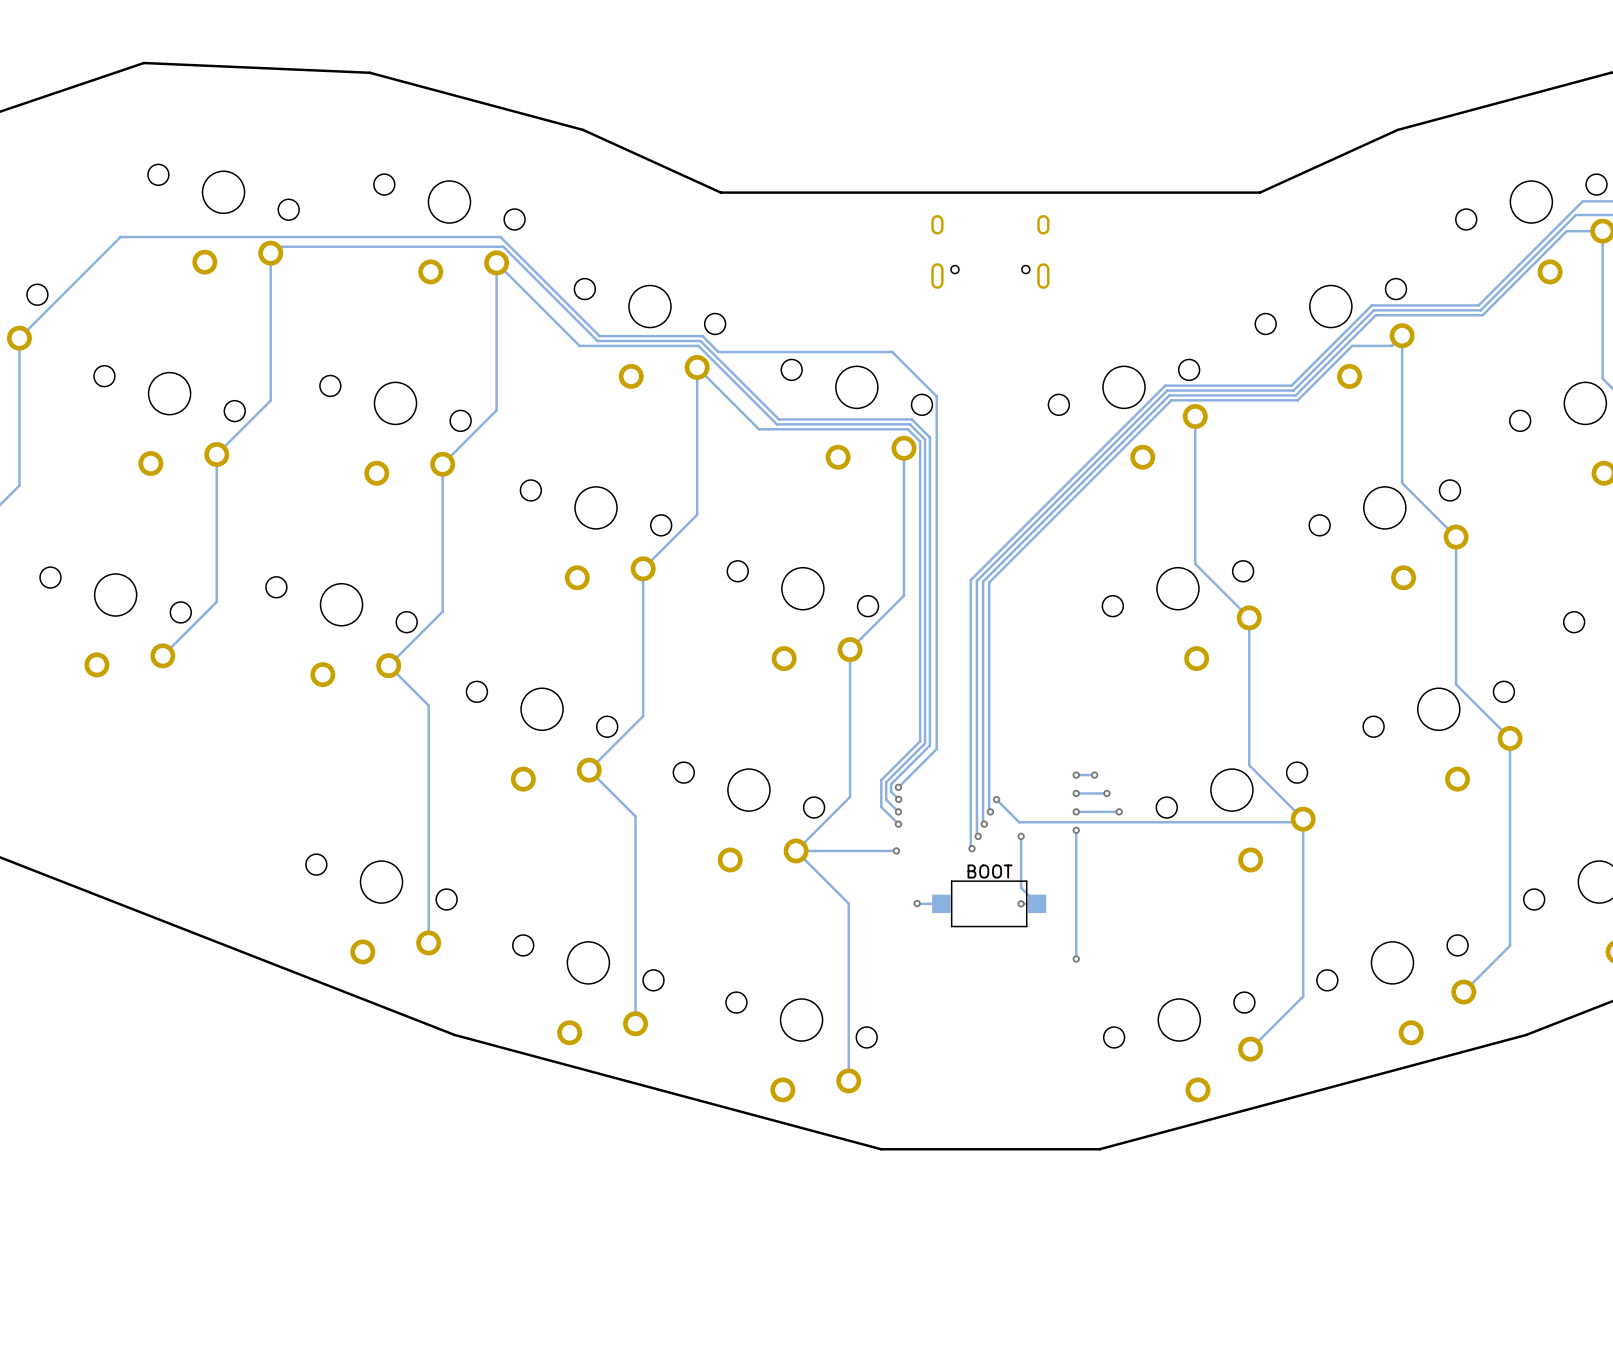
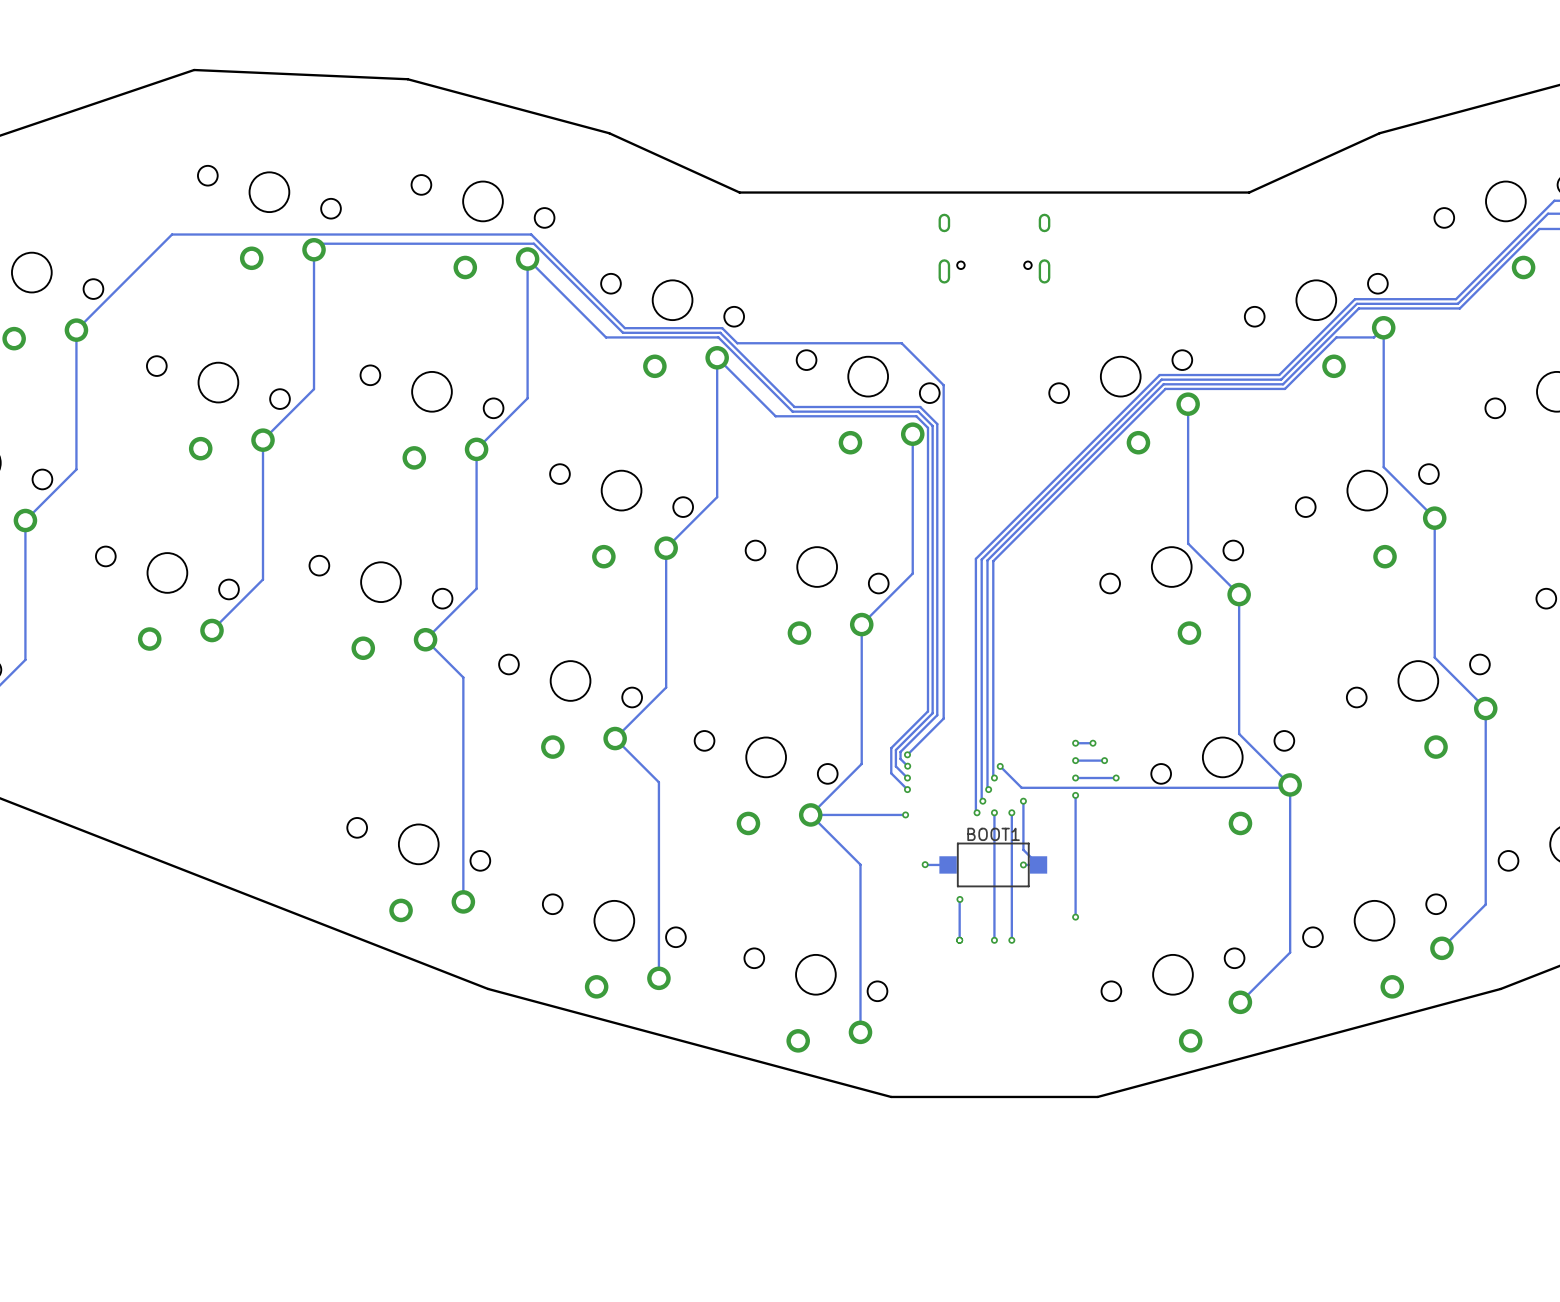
track: none -> (994, 812) (994, 940)
via: none -> (994, 812)
track: none -> (1011, 812) (1011, 940)
via: none -> (1011, 812)
BOOT name: BOOT (990, 871) -> BOOT1 (993, 834)
track: none -> (959, 899) (959, 940)
via: none -> (959, 899)
via: none -> (959, 940)
via: none -> (994, 940)
via: none -> (1011, 940)

